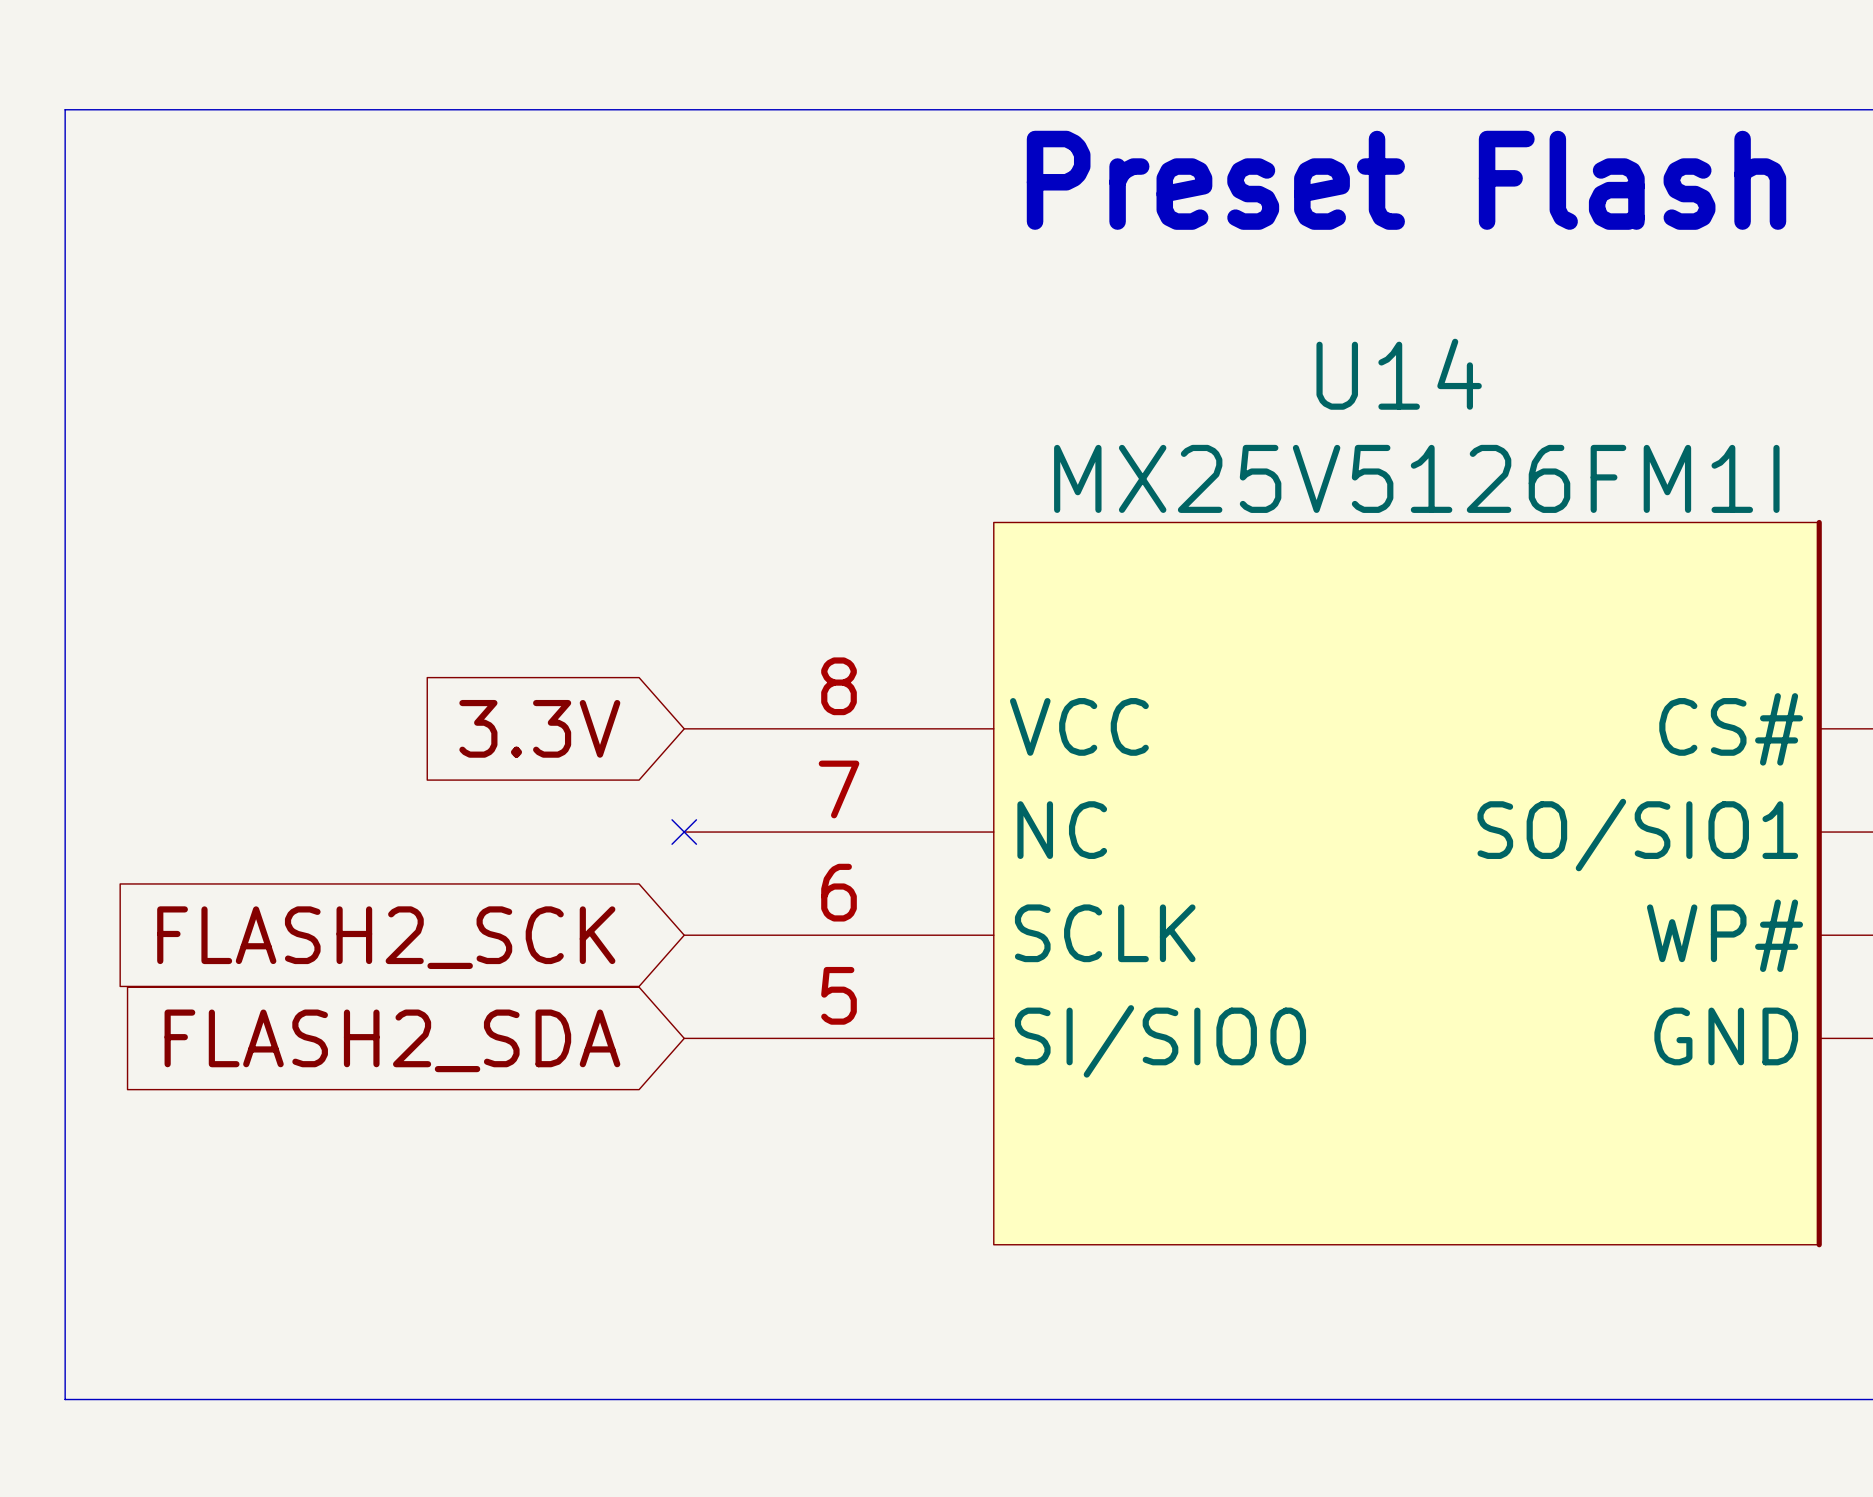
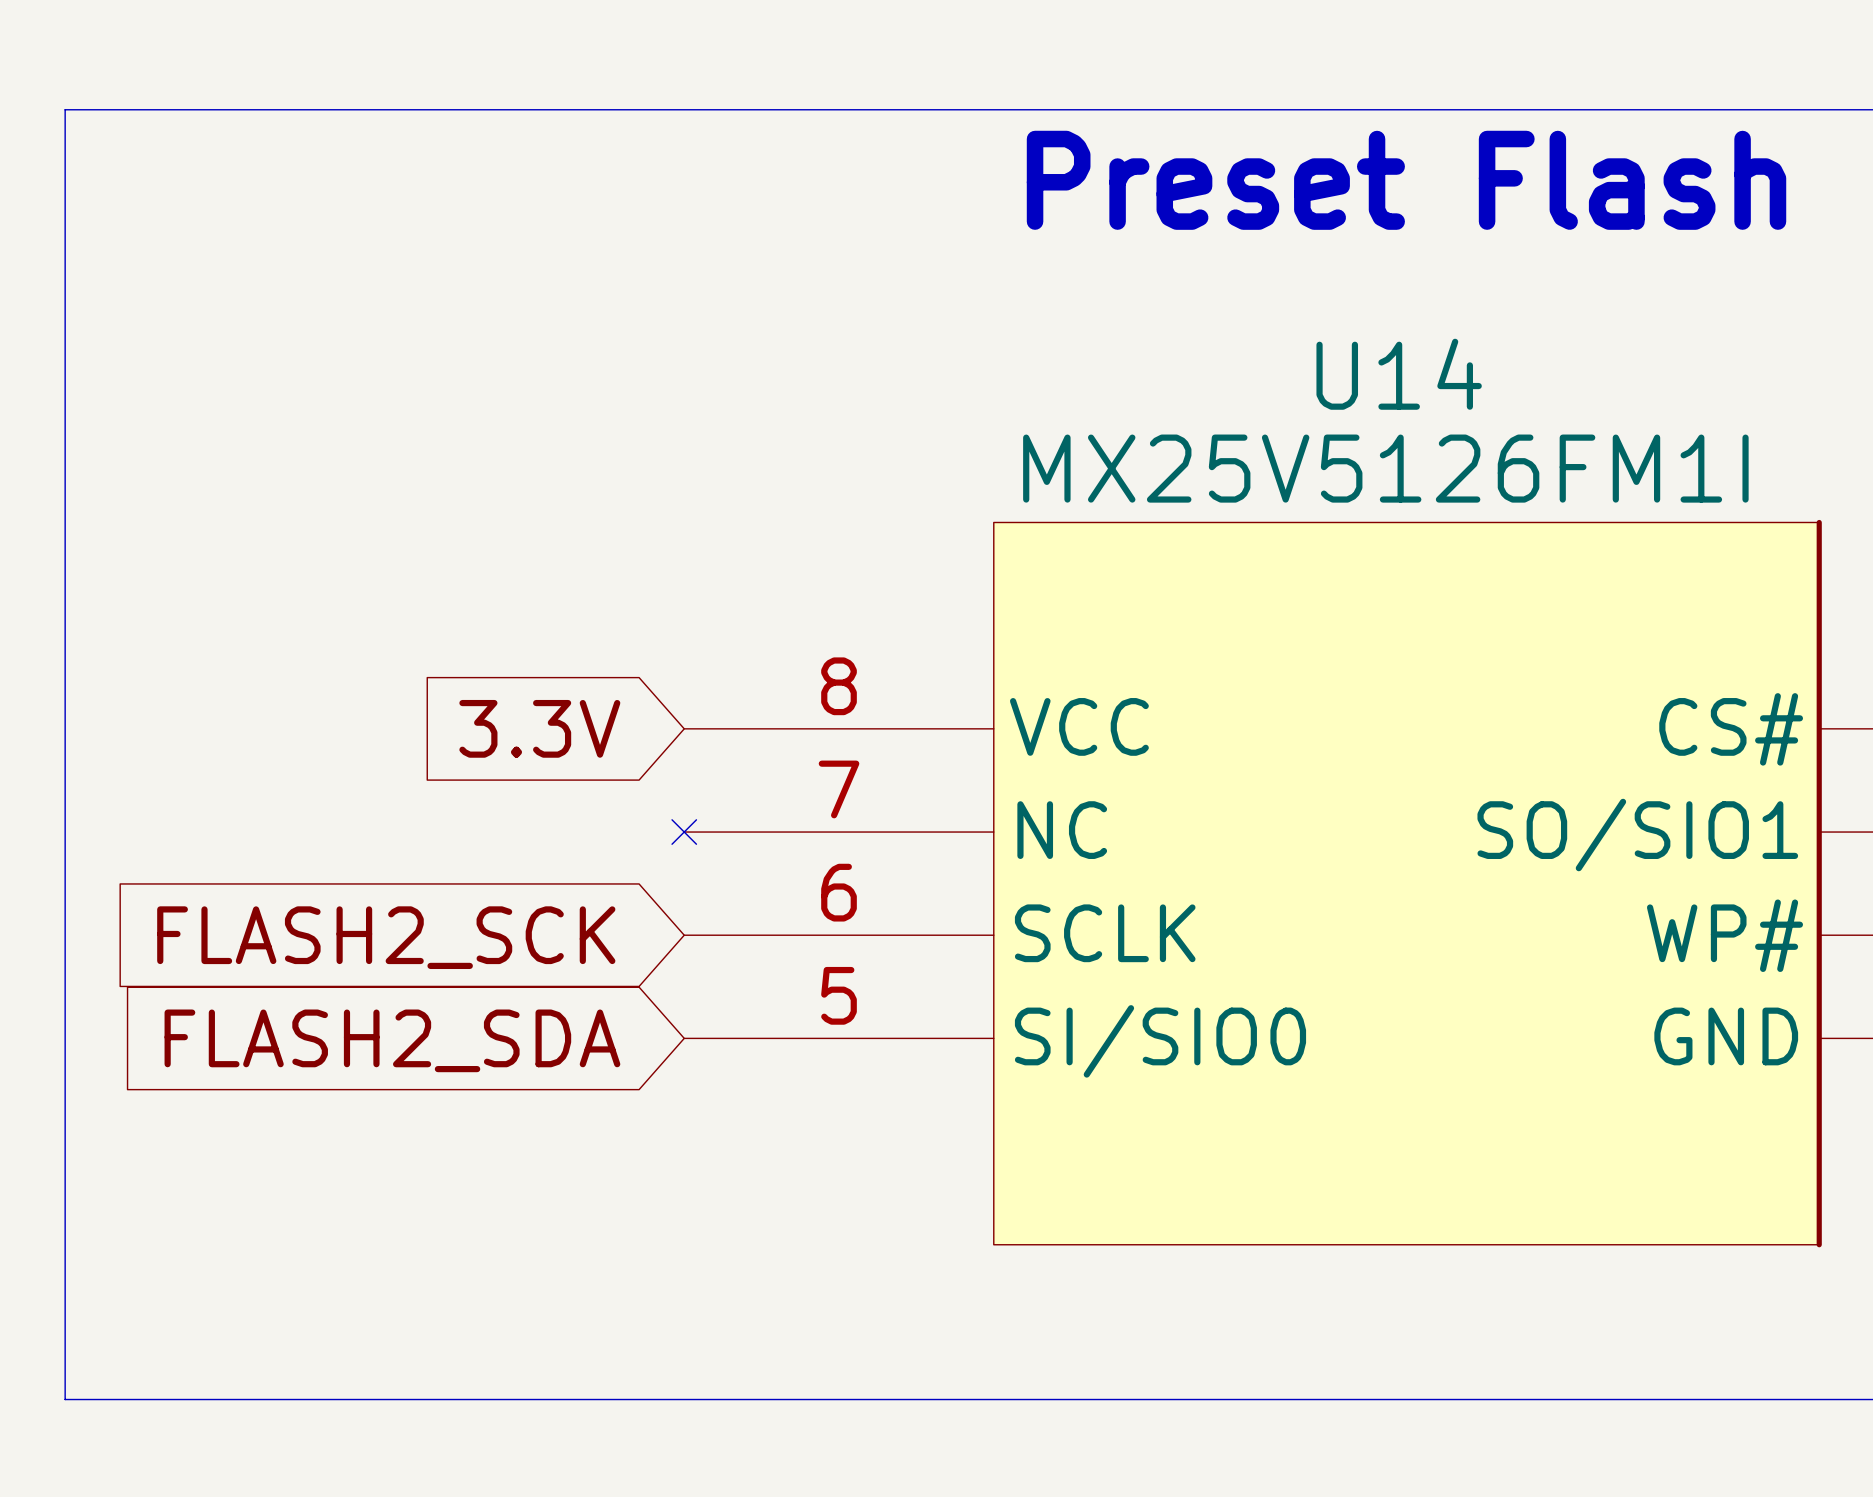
U14 value position: MX25V5126FM1I (1416, 478) -> MX25V5126FM1I (1385, 468)

